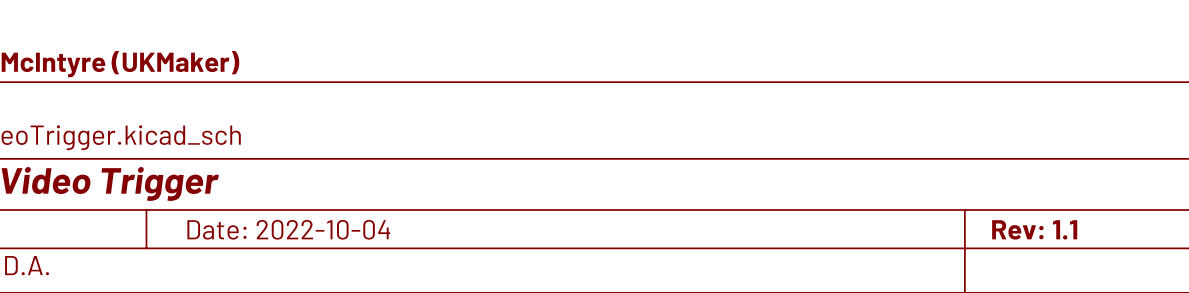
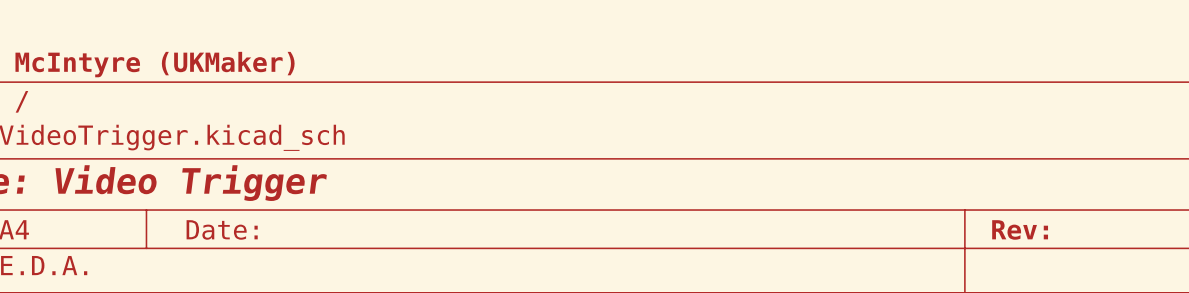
title block: Date: 2022-10-04 (288, 229) -> Date: (222, 229)
title block: Rev: 1.1 (1034, 229) -> Rev: (1020, 229)

